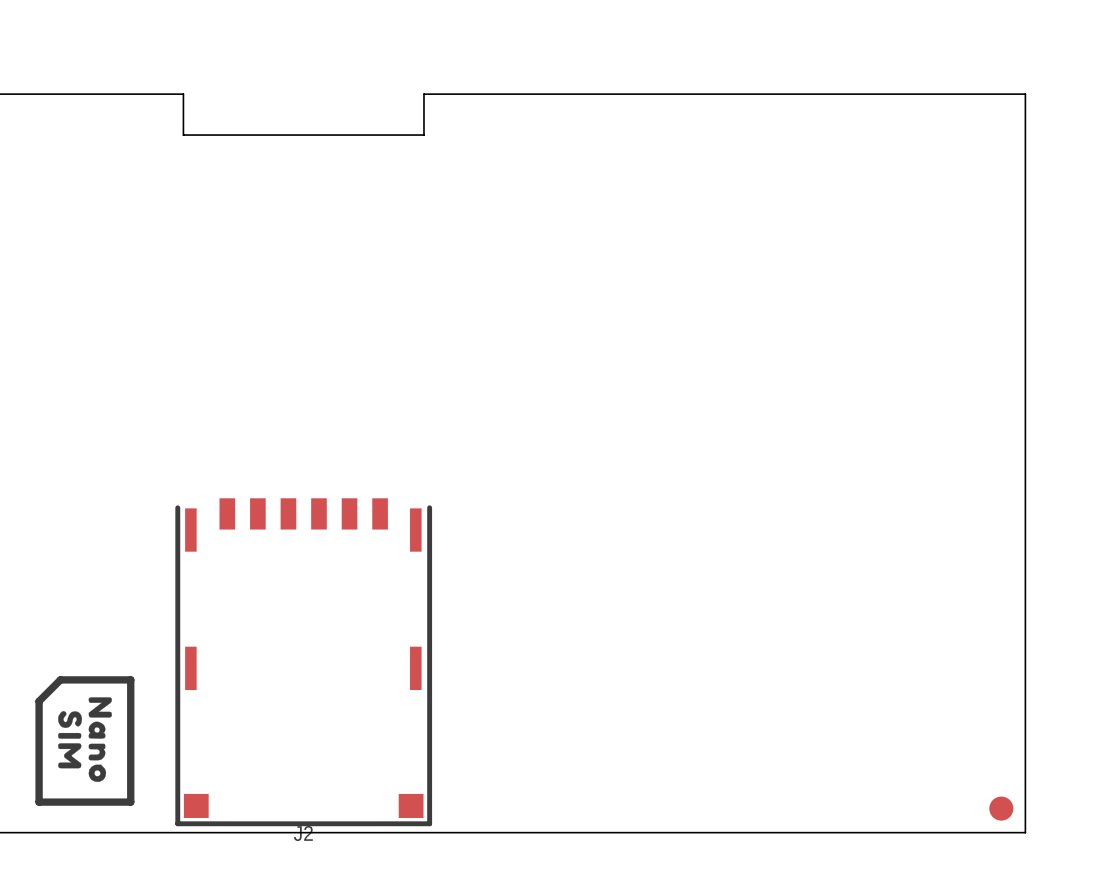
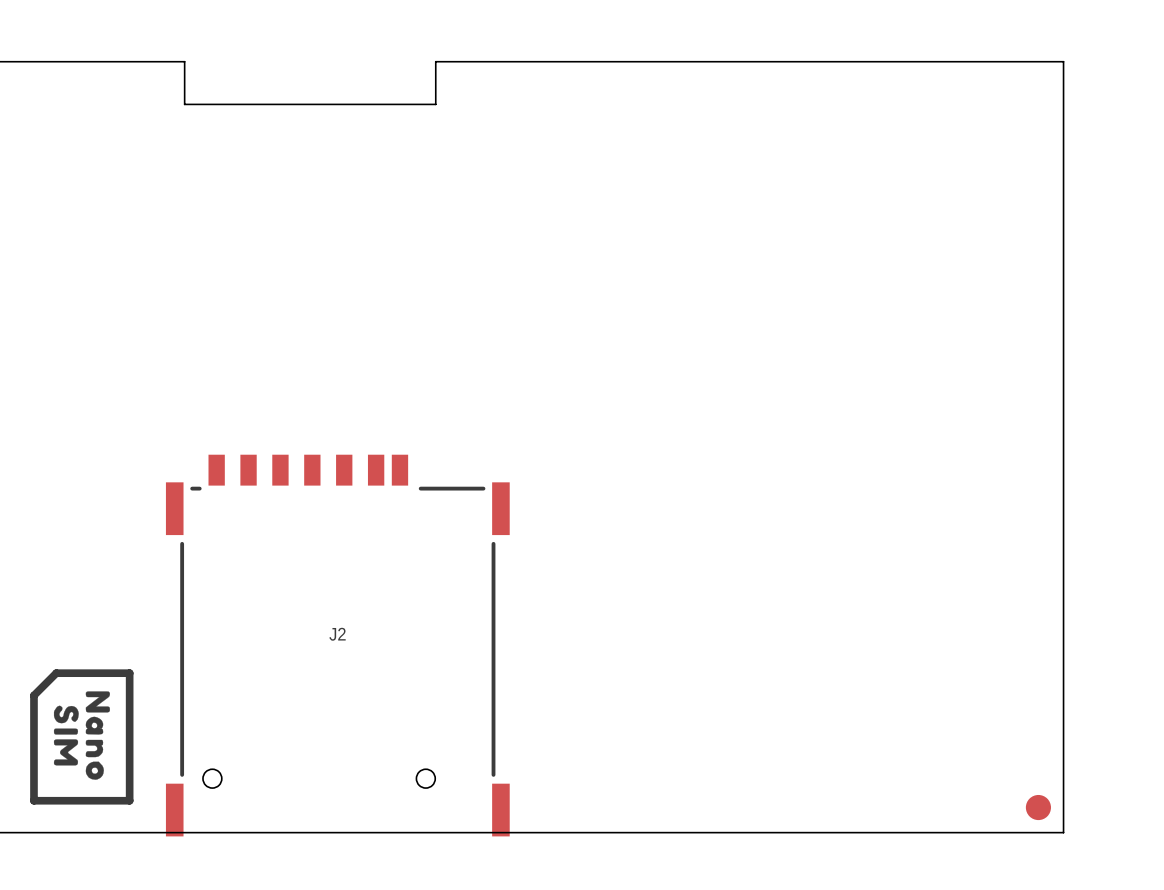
J2 footprint: [175, 498, 433, 827] -> [165, 454, 510, 837]
J2 name position: J2 (303, 833) -> J2 (337, 634)

